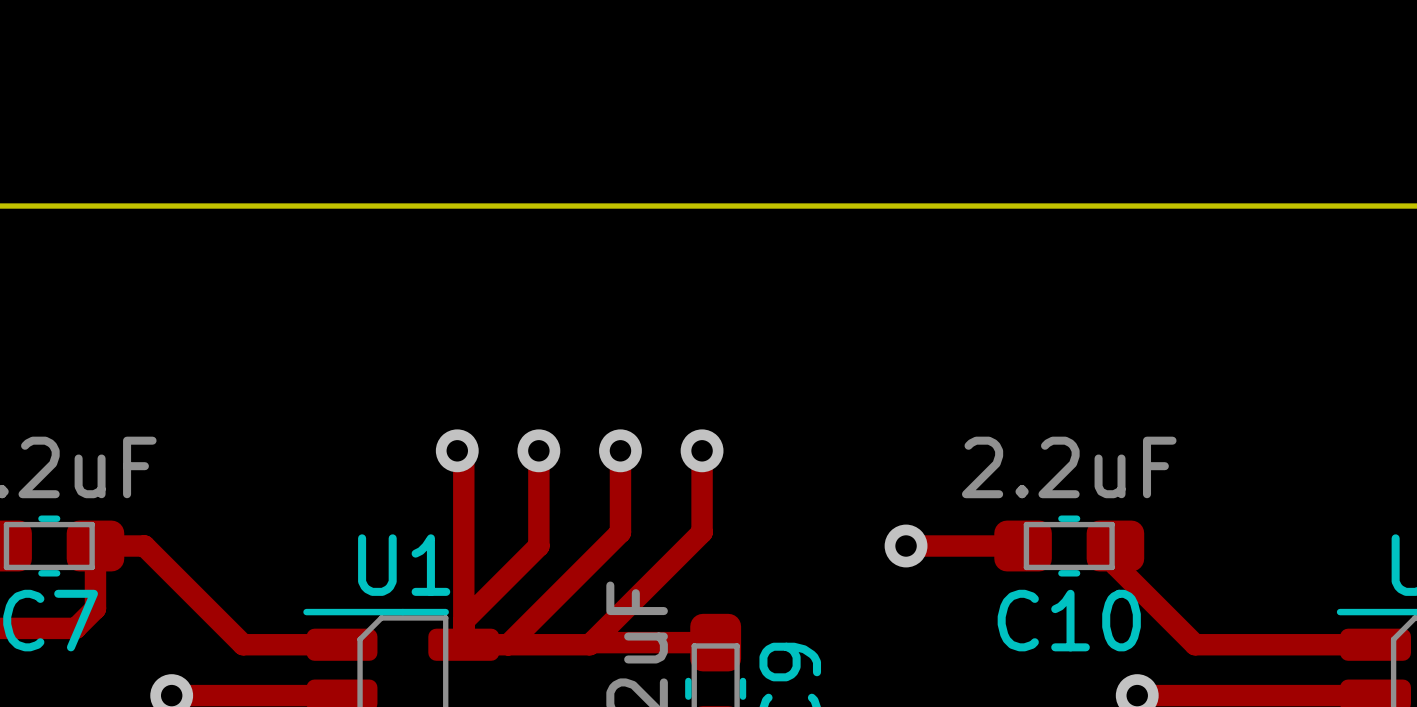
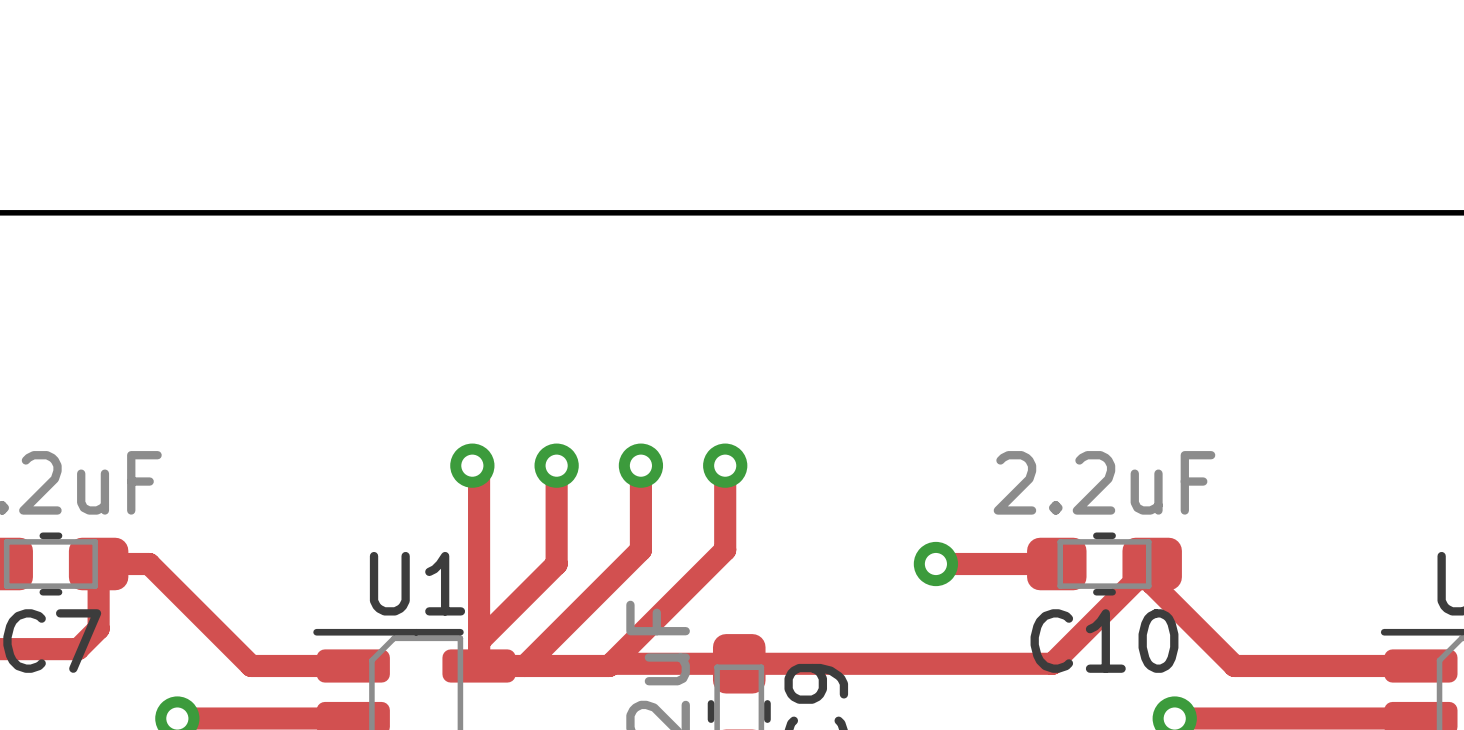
top track: none -> (1152, 564) (1052, 663) (739, 663)

